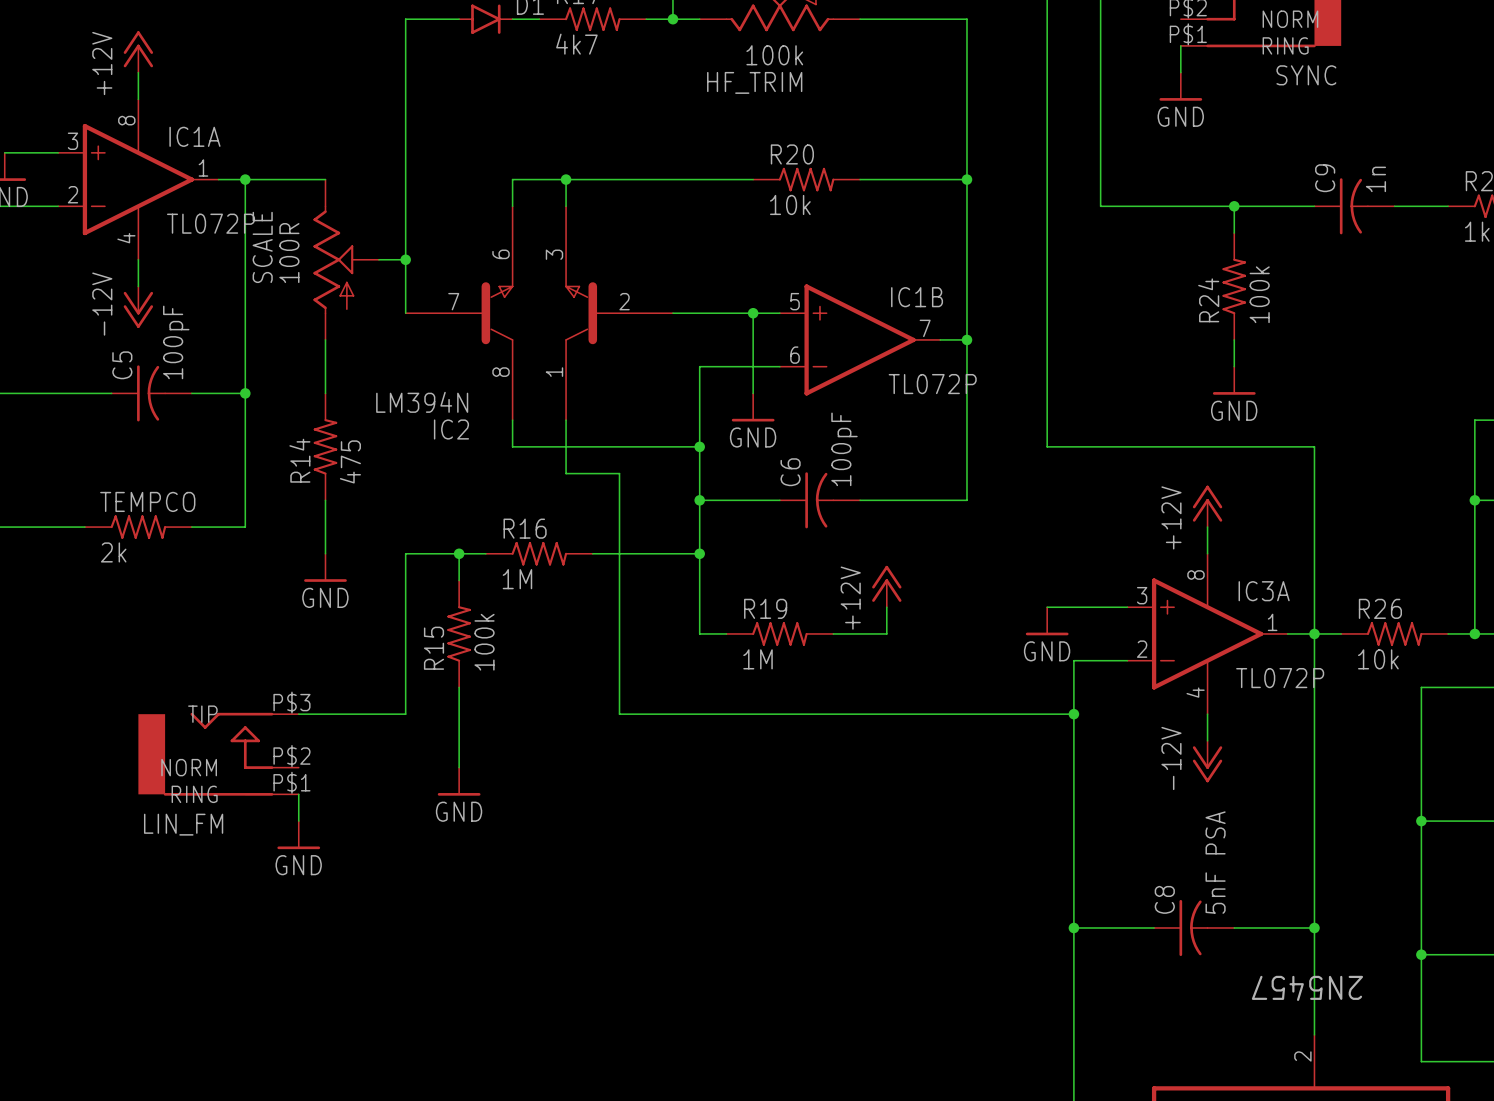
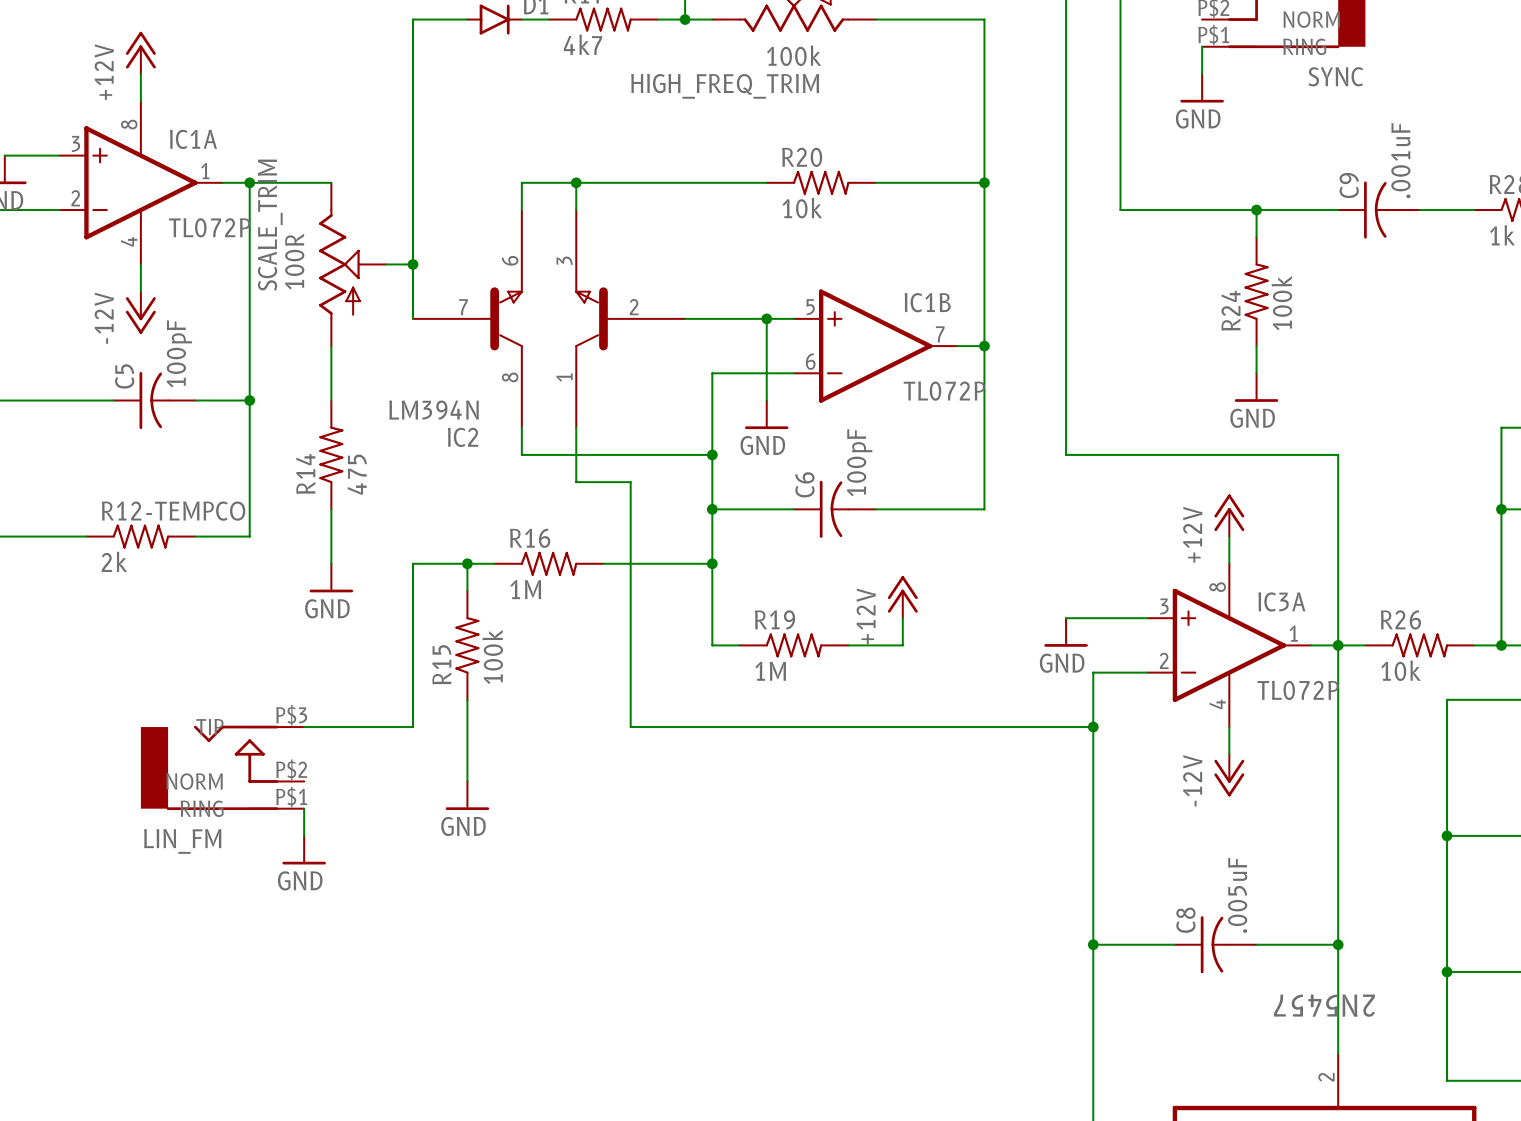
HF_TRIM name: HF_TRIM (754, 82) -> HIGH_FREQ_TRIM (725, 86)
C9 value: 1n (1375, 179) -> .001uF (1400, 160)
SCALE name: SCALE (262, 247) -> SCALE_TRIM (270, 225)
TEMPCO name: TEMPCO (147, 501) -> R12-TEMPCO (173, 511)
C8 value: 5nF PSA (1215, 862) -> .005uF (1237, 895)

